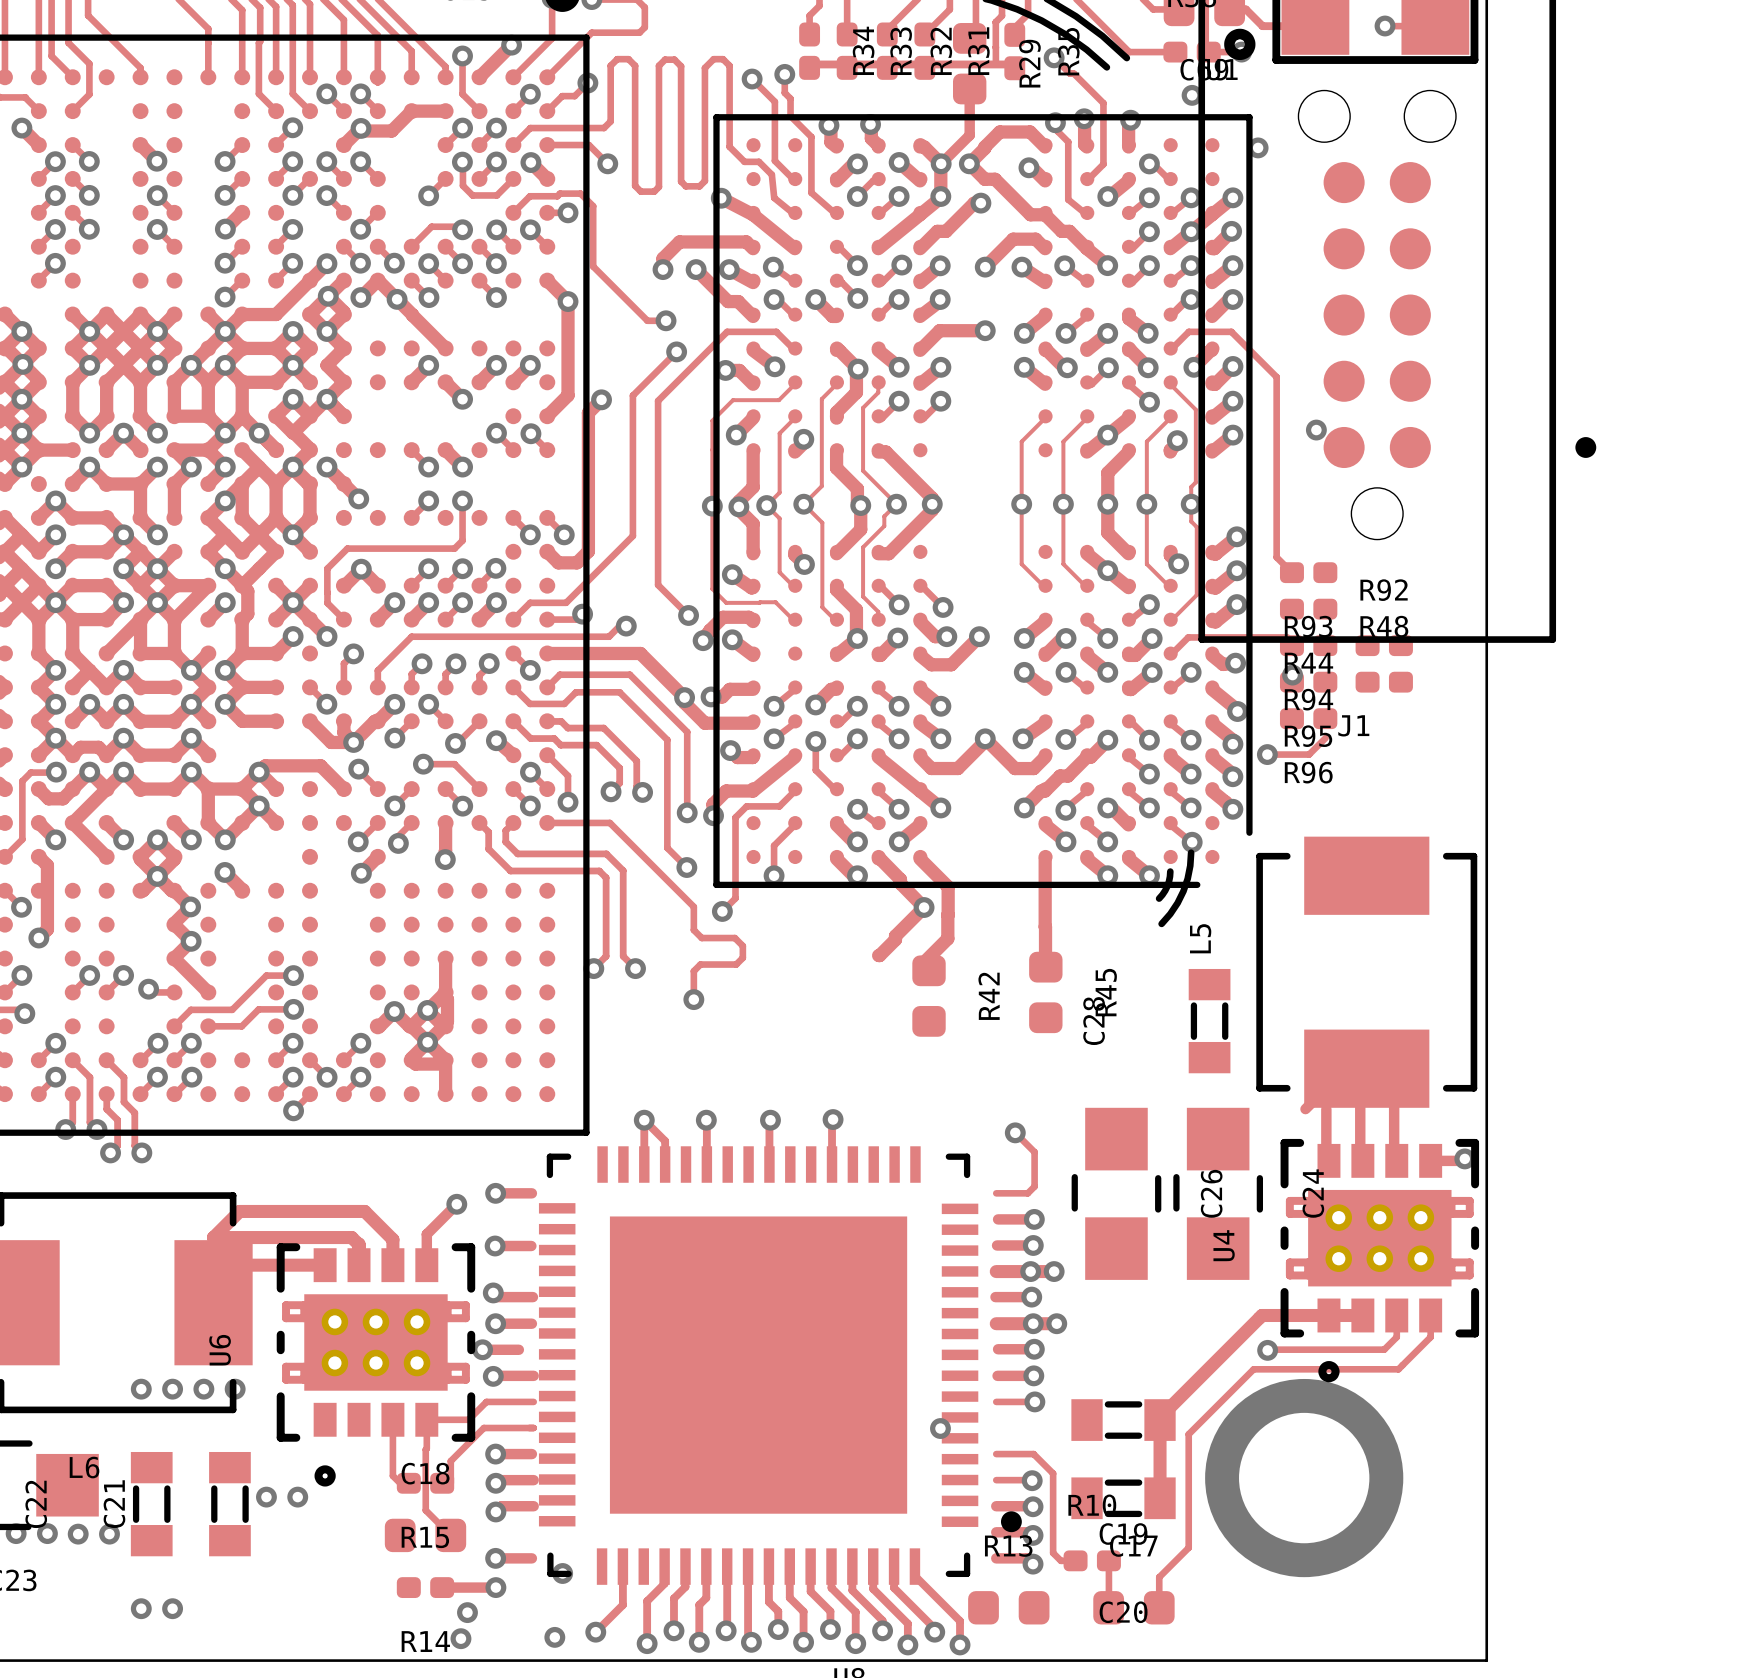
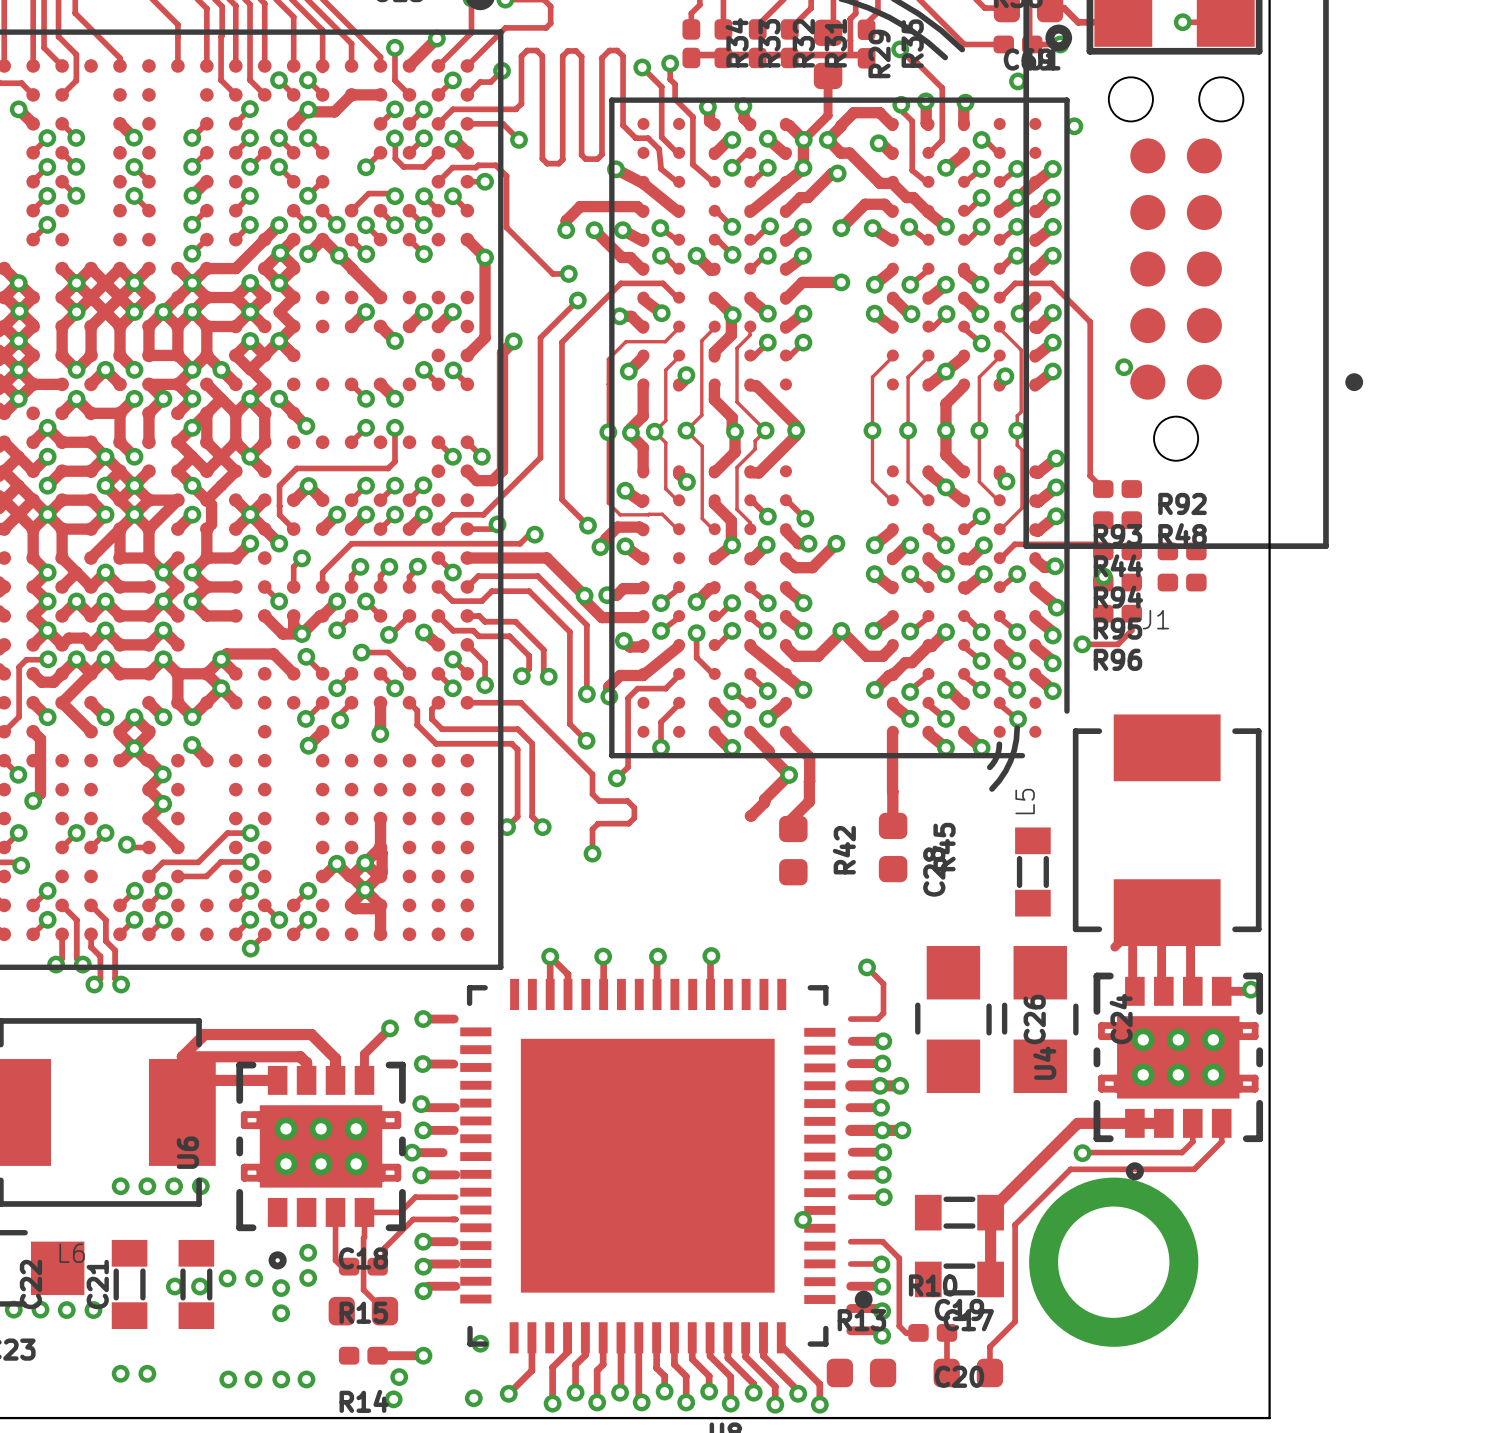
via: none -> (308, 1252)
via: none -> (308, 1277)
via: none -> (174, 1286)
via: none -> (200, 1286)
via: none -> (281, 1288)
via: none -> (281, 1313)
track: (495, 1558) (531, 1558) -> none
via: (495, 1558) -> none
via: none -> (228, 1379)
via: none -> (253, 1379)
via: none -> (281, 1379)
via: none -> (306, 1379)

